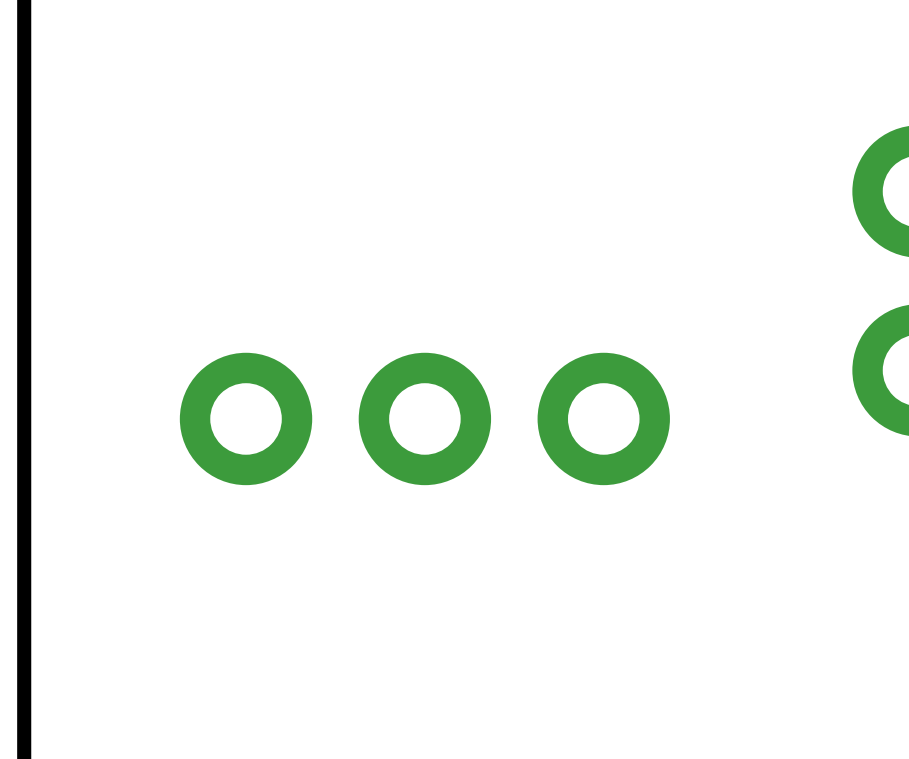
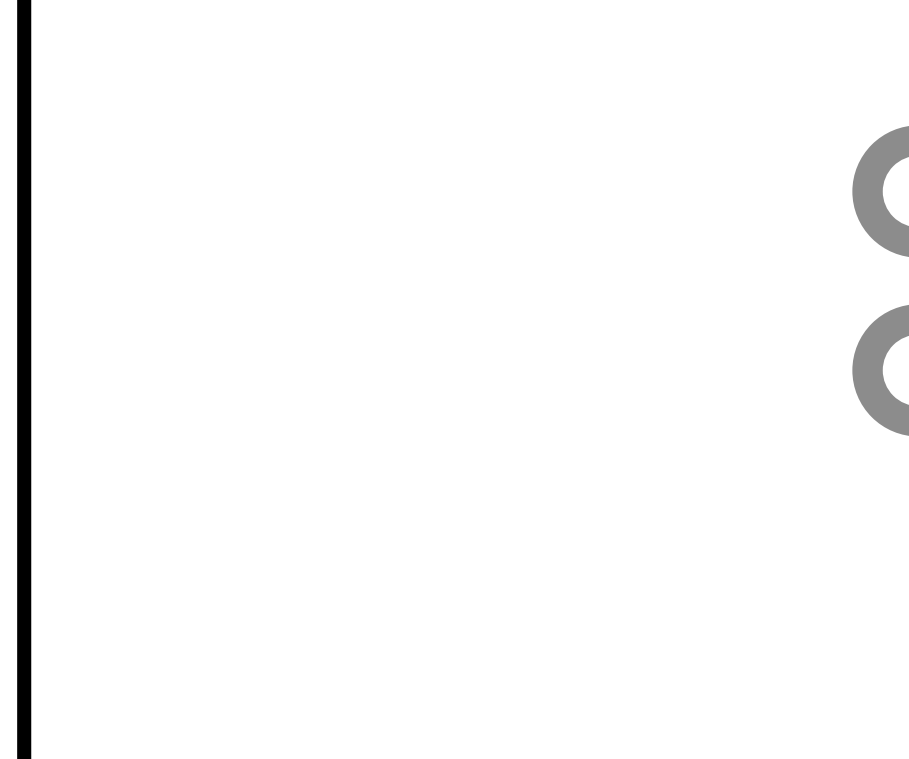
part: (424, 418) -> none

